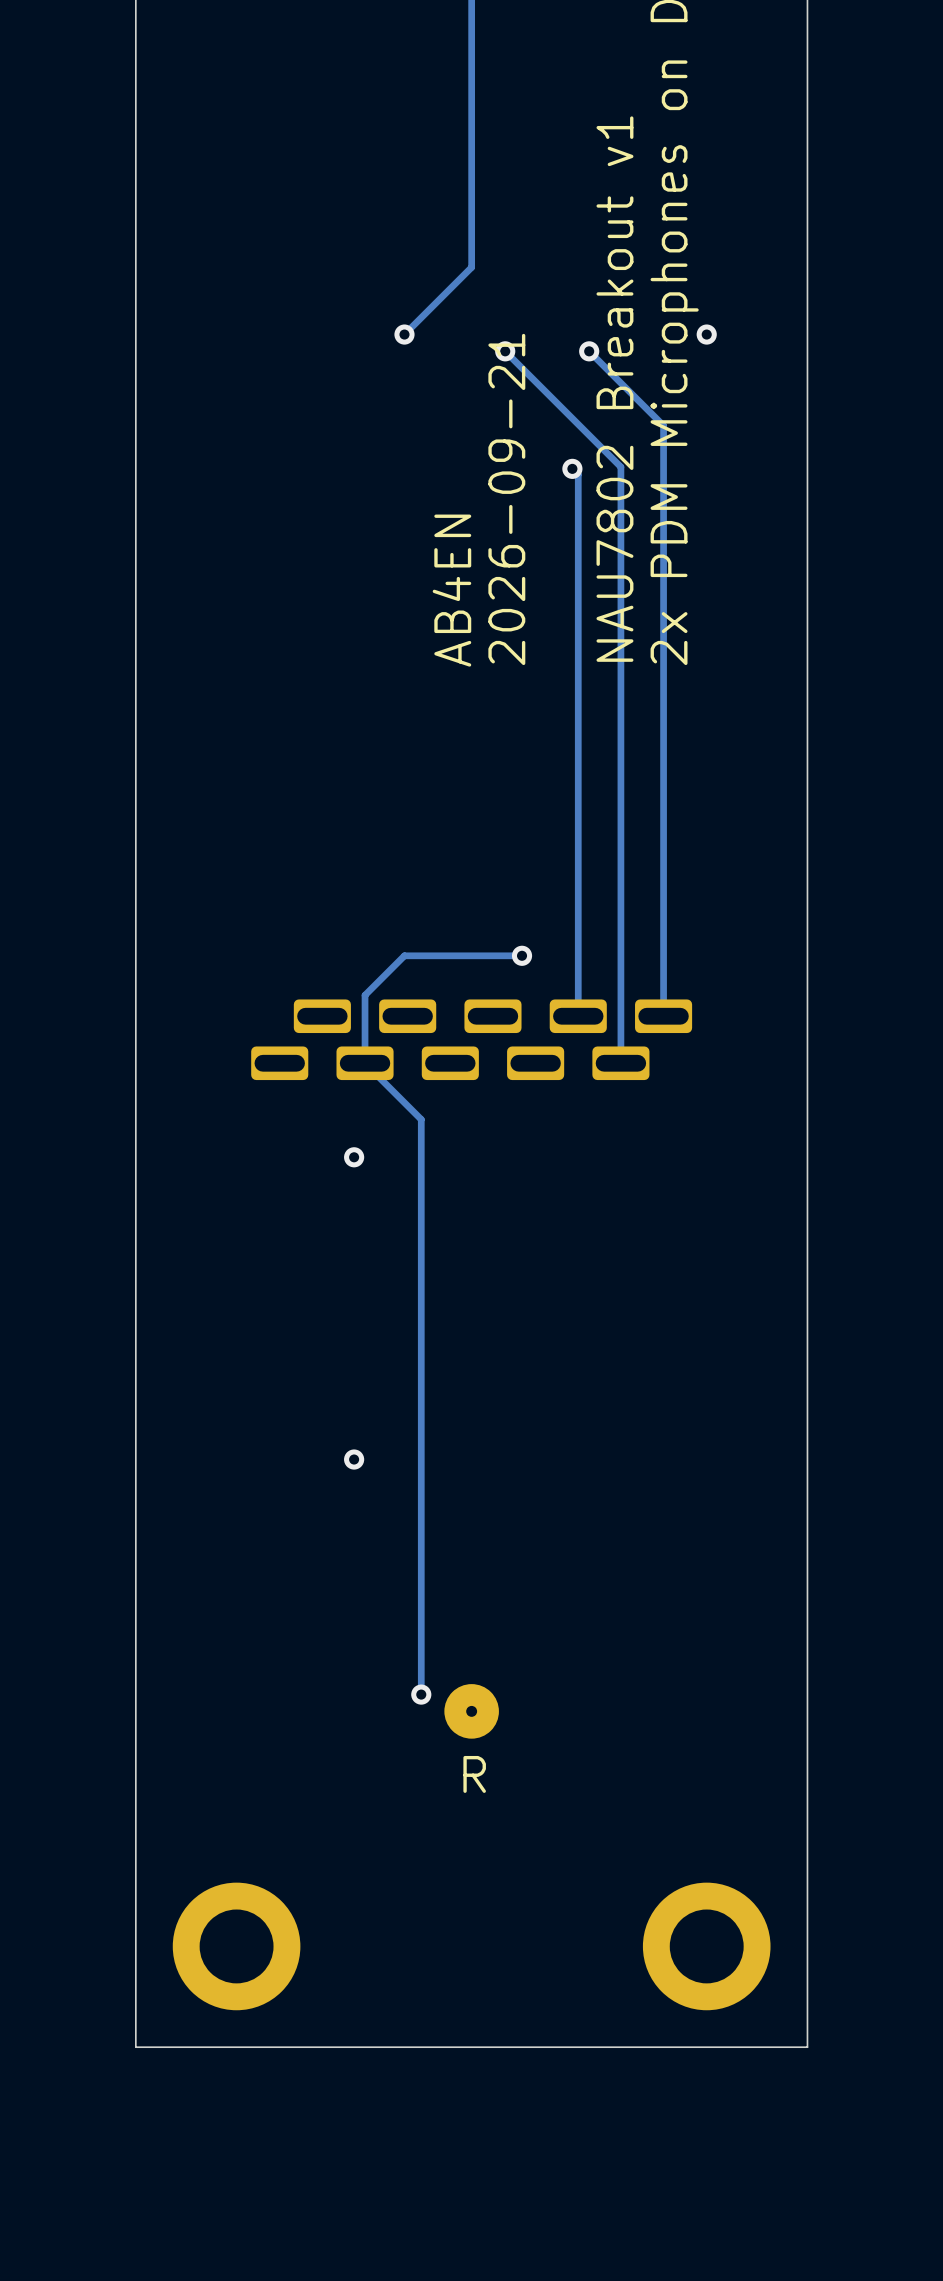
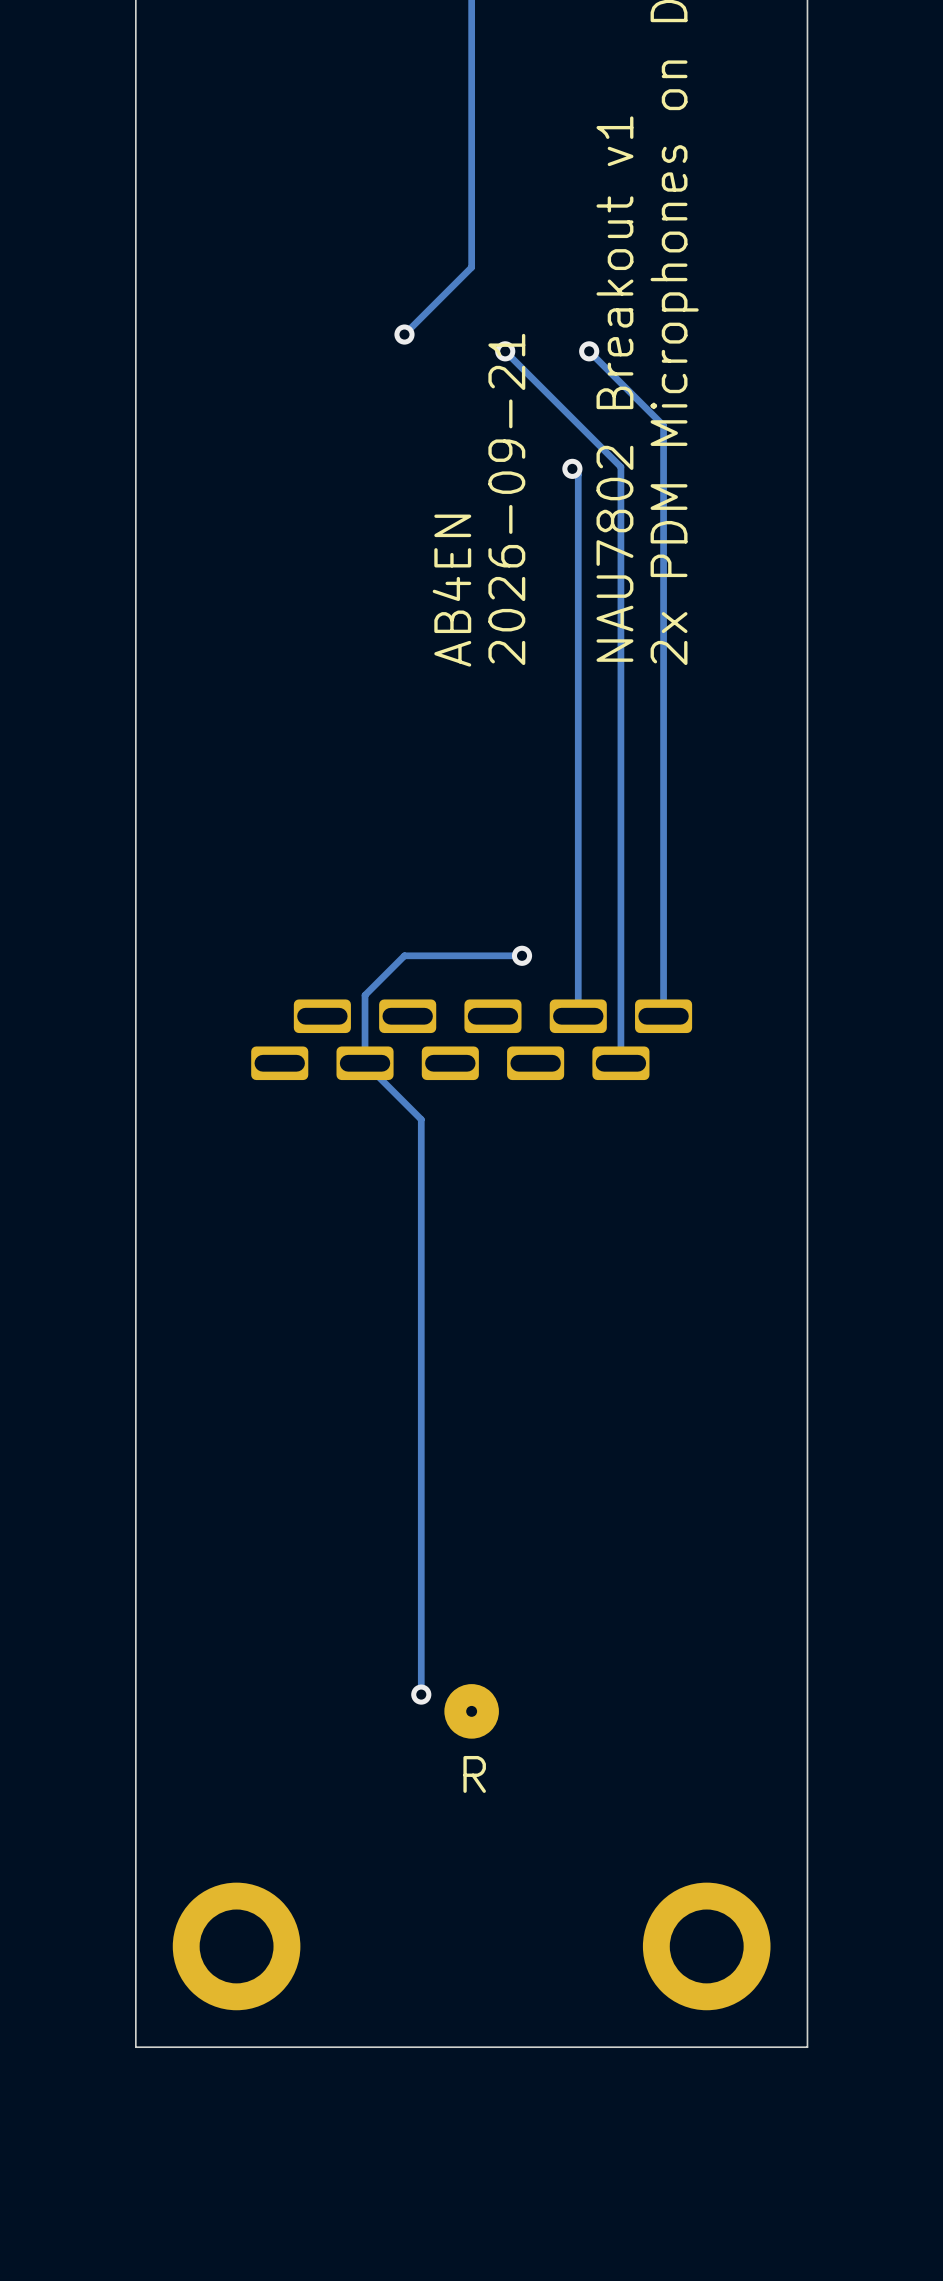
via: (706, 334) -> none
via: (354, 1157) -> none
via: (354, 1459) -> none

